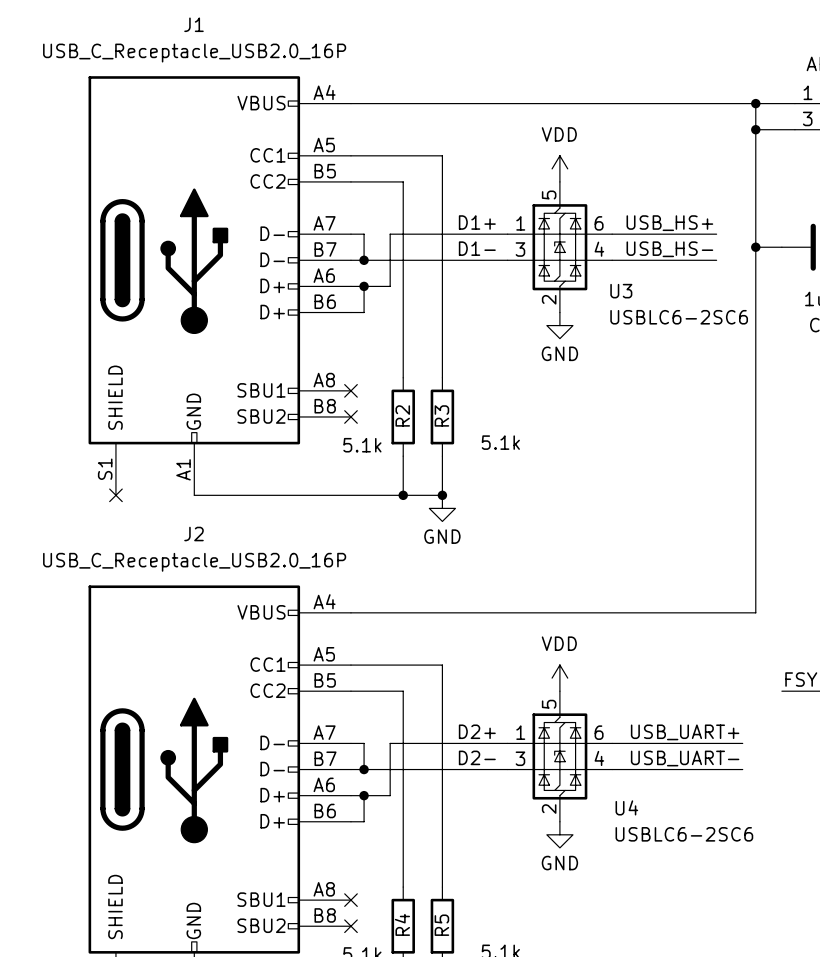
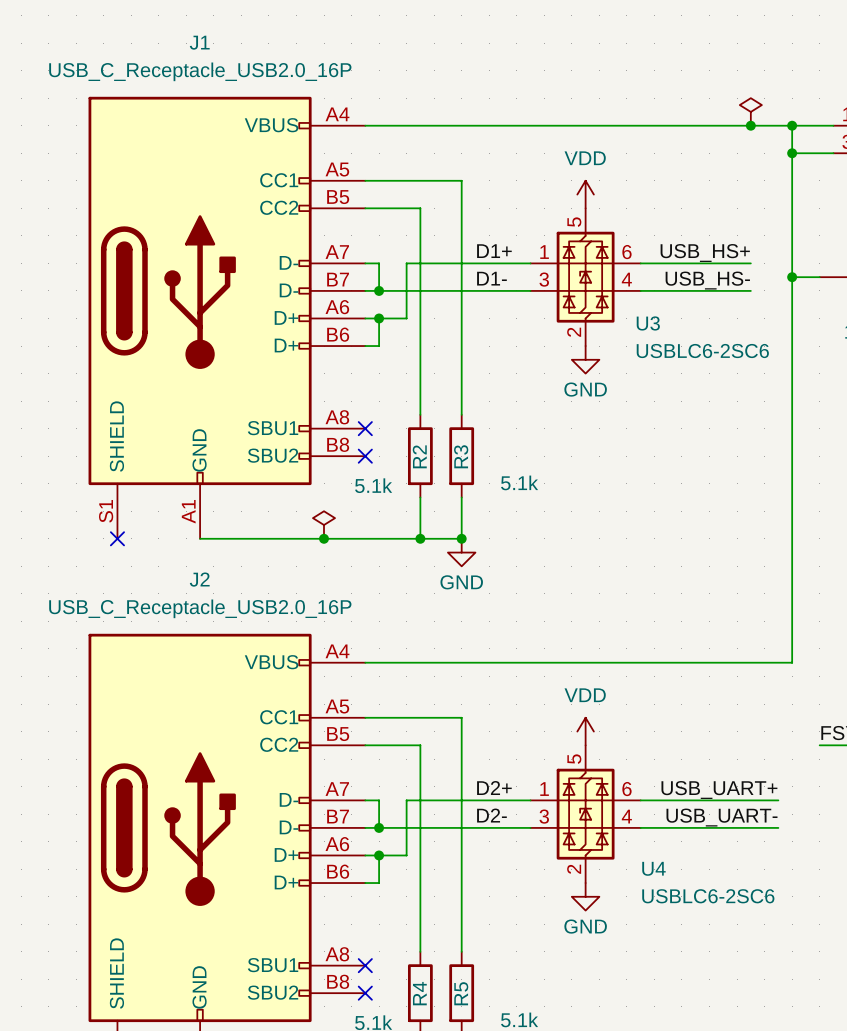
power symbol: none -> (750, 111)
junction: none -> (750, 125)
power symbol: none -> (324, 525)
junction: none -> (324, 538)

